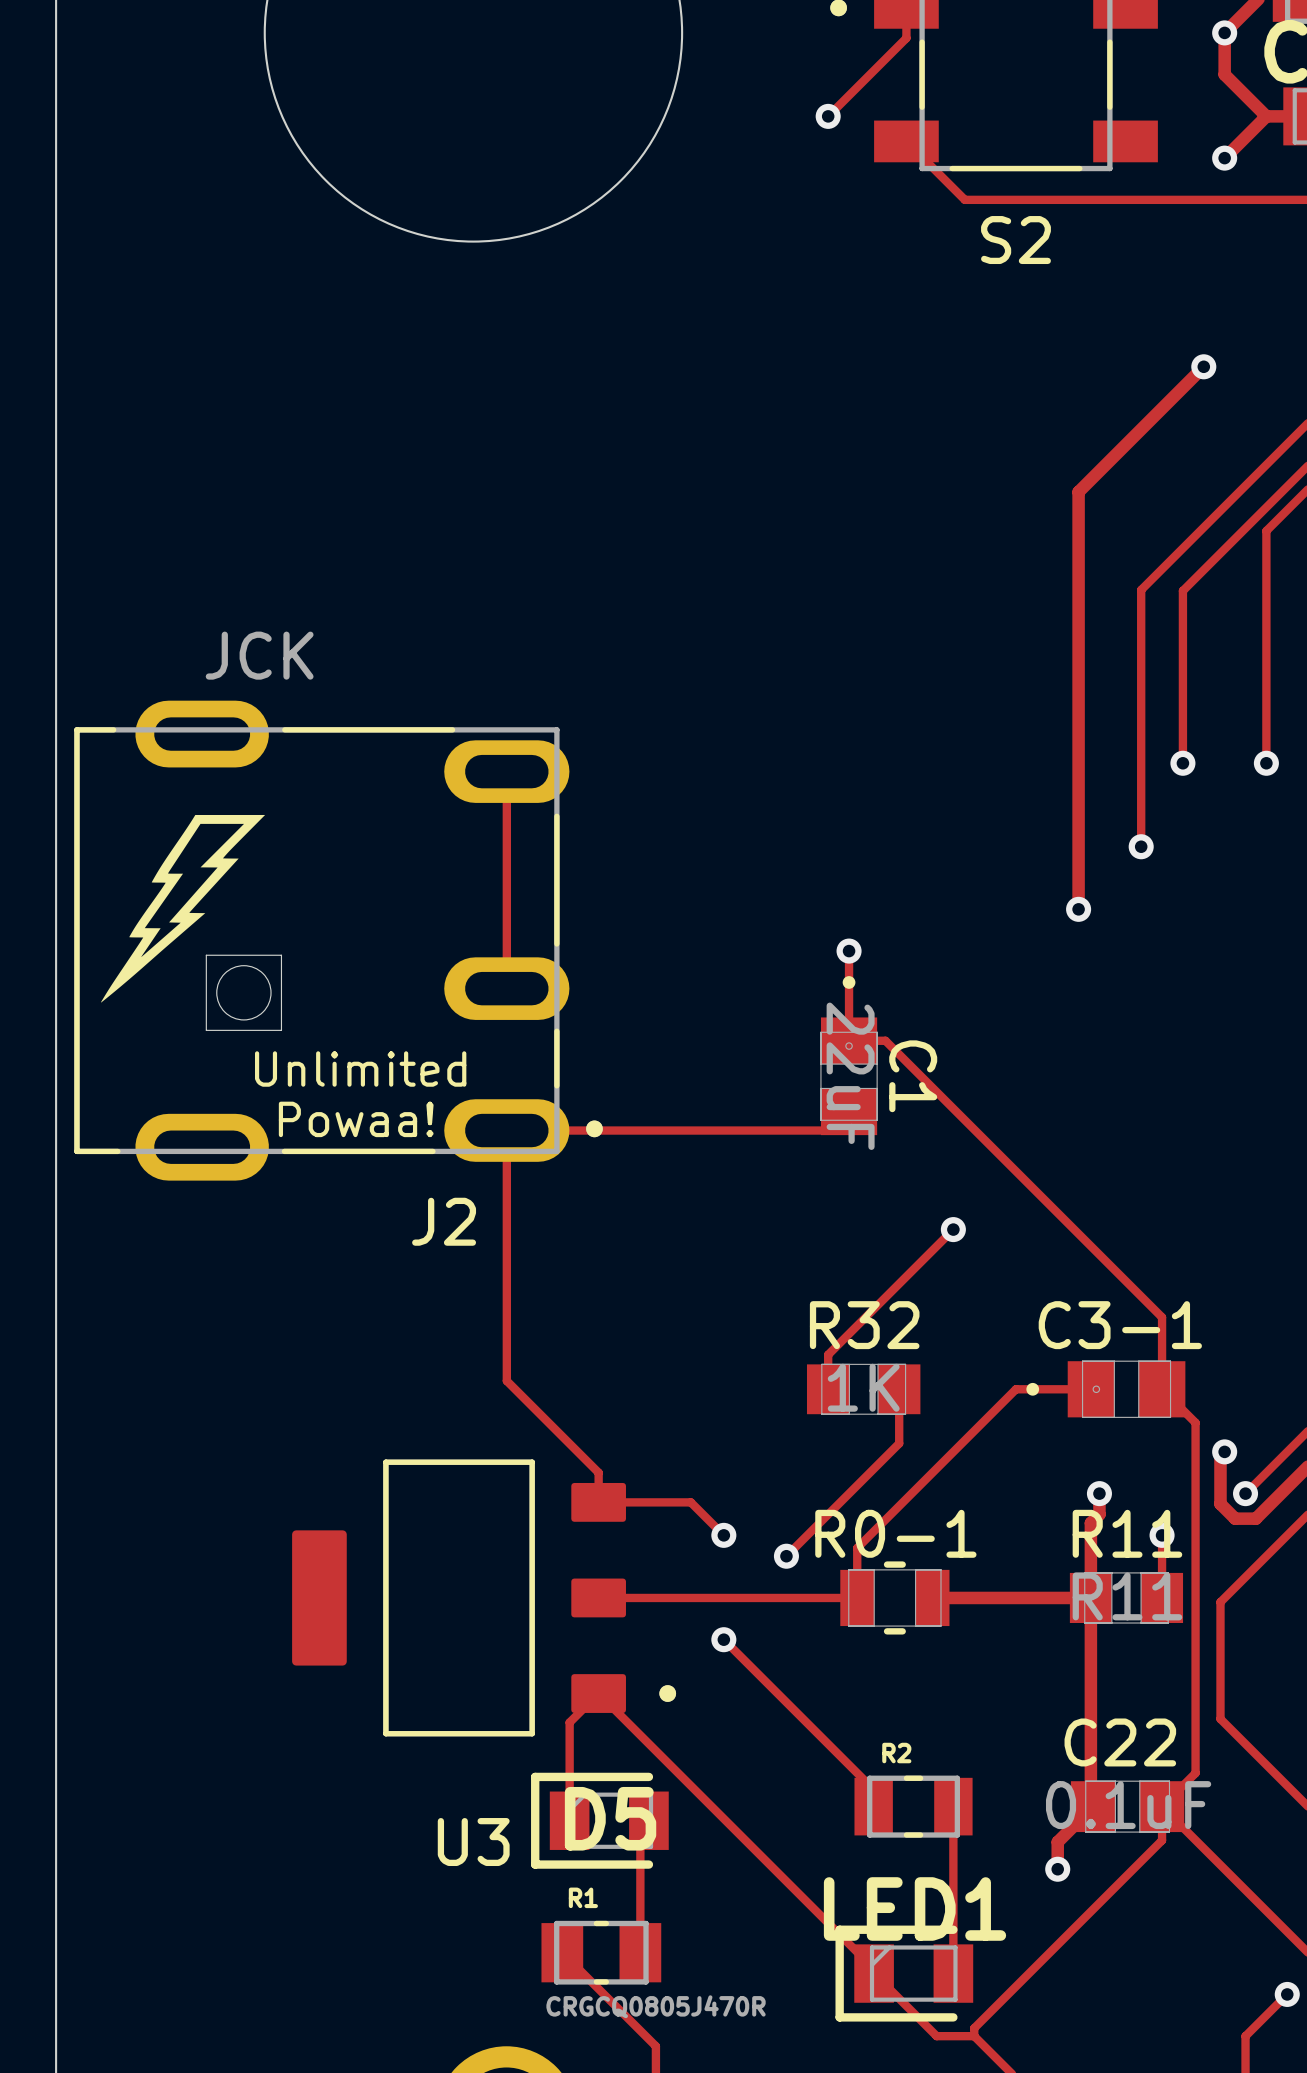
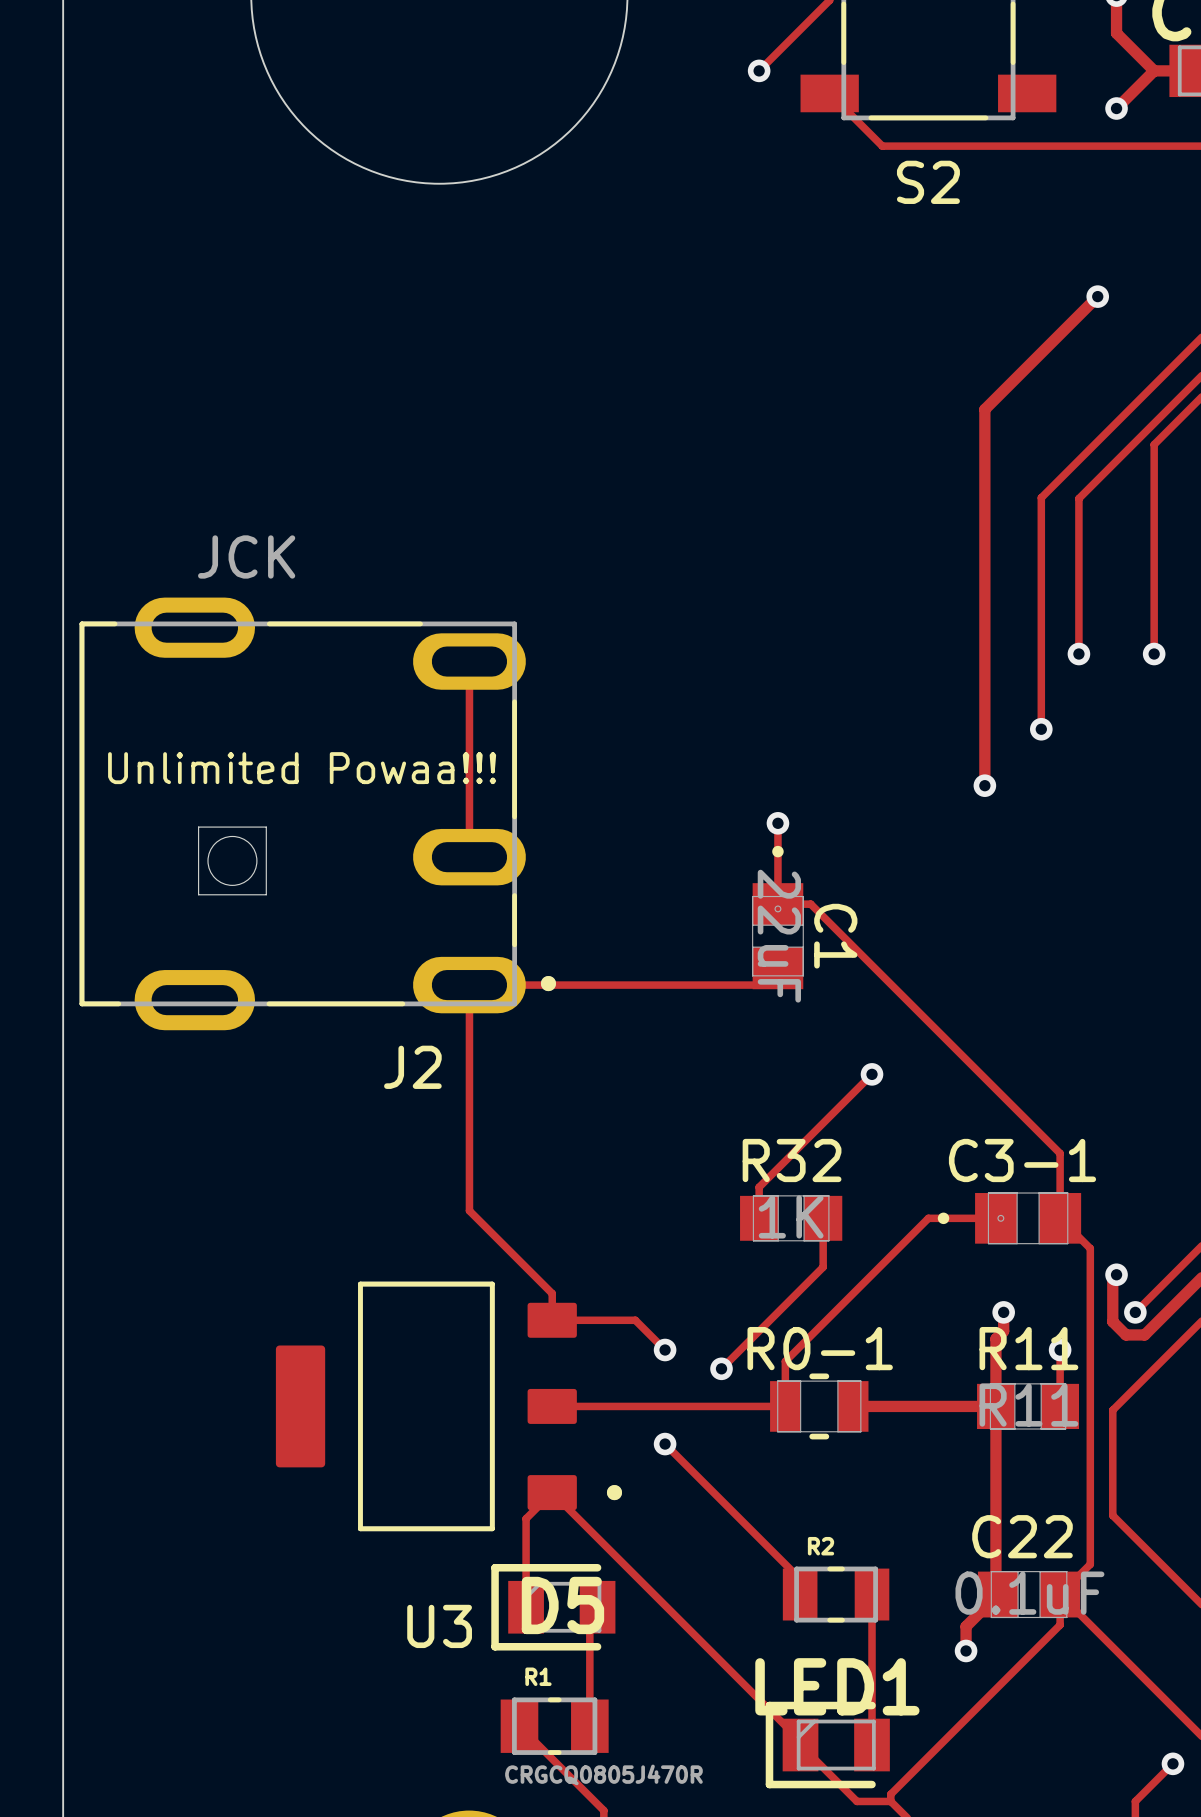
drawing: [100, 814, 266, 1003] -> none
text: none -> Unlimited Powaa!!! (302, 768)
text: Unlimited (360, 1069) -> none
text: Powaa! (356, 1119) -> none

